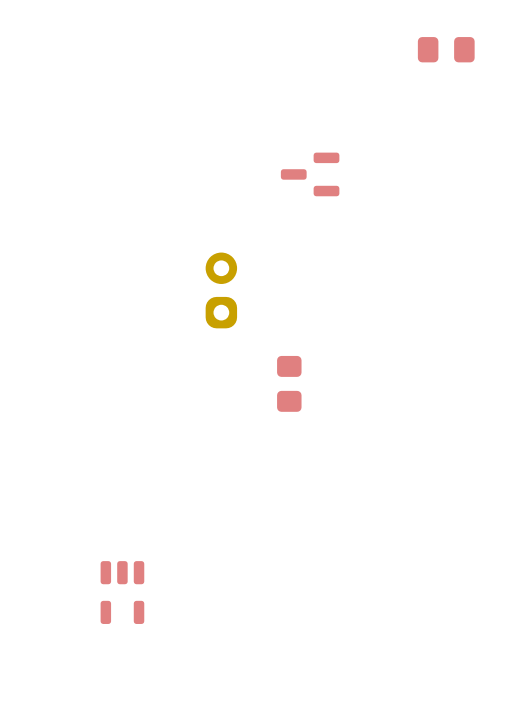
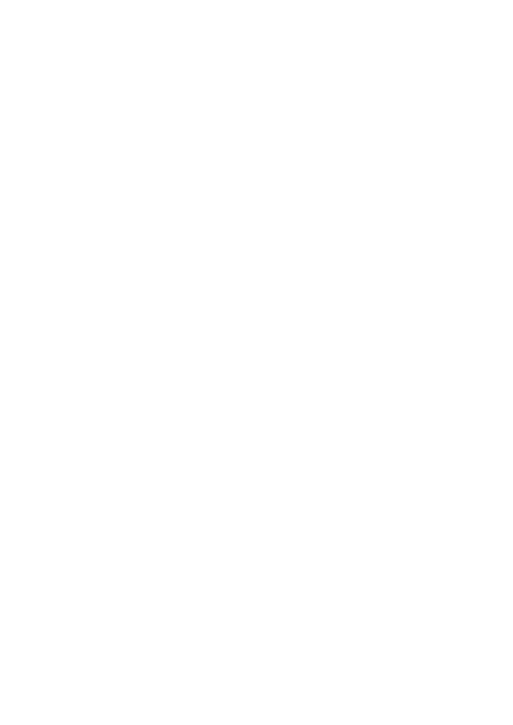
part: (446, 49) -> none
part: (310, 174) -> none
part: (221, 290) -> none
part: (289, 383) -> none
part: (122, 592) -> none

